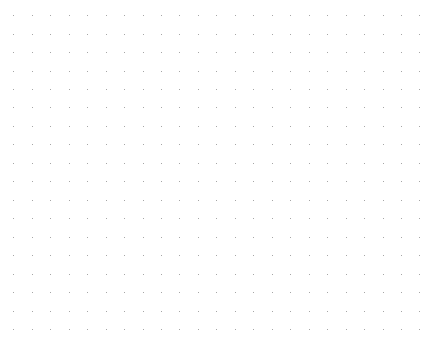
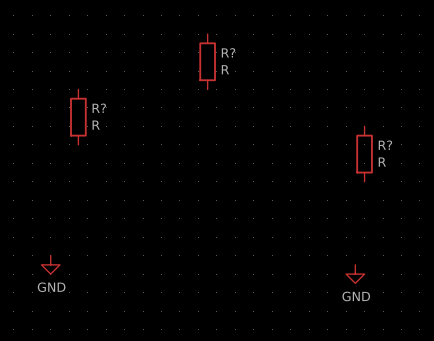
R?: none -> R (207, 61)
R?: none -> R (78, 117)
R?: none -> R (364, 154)
power symbol: none -> GND (50, 264)
power symbol: none -> GND (355, 274)

